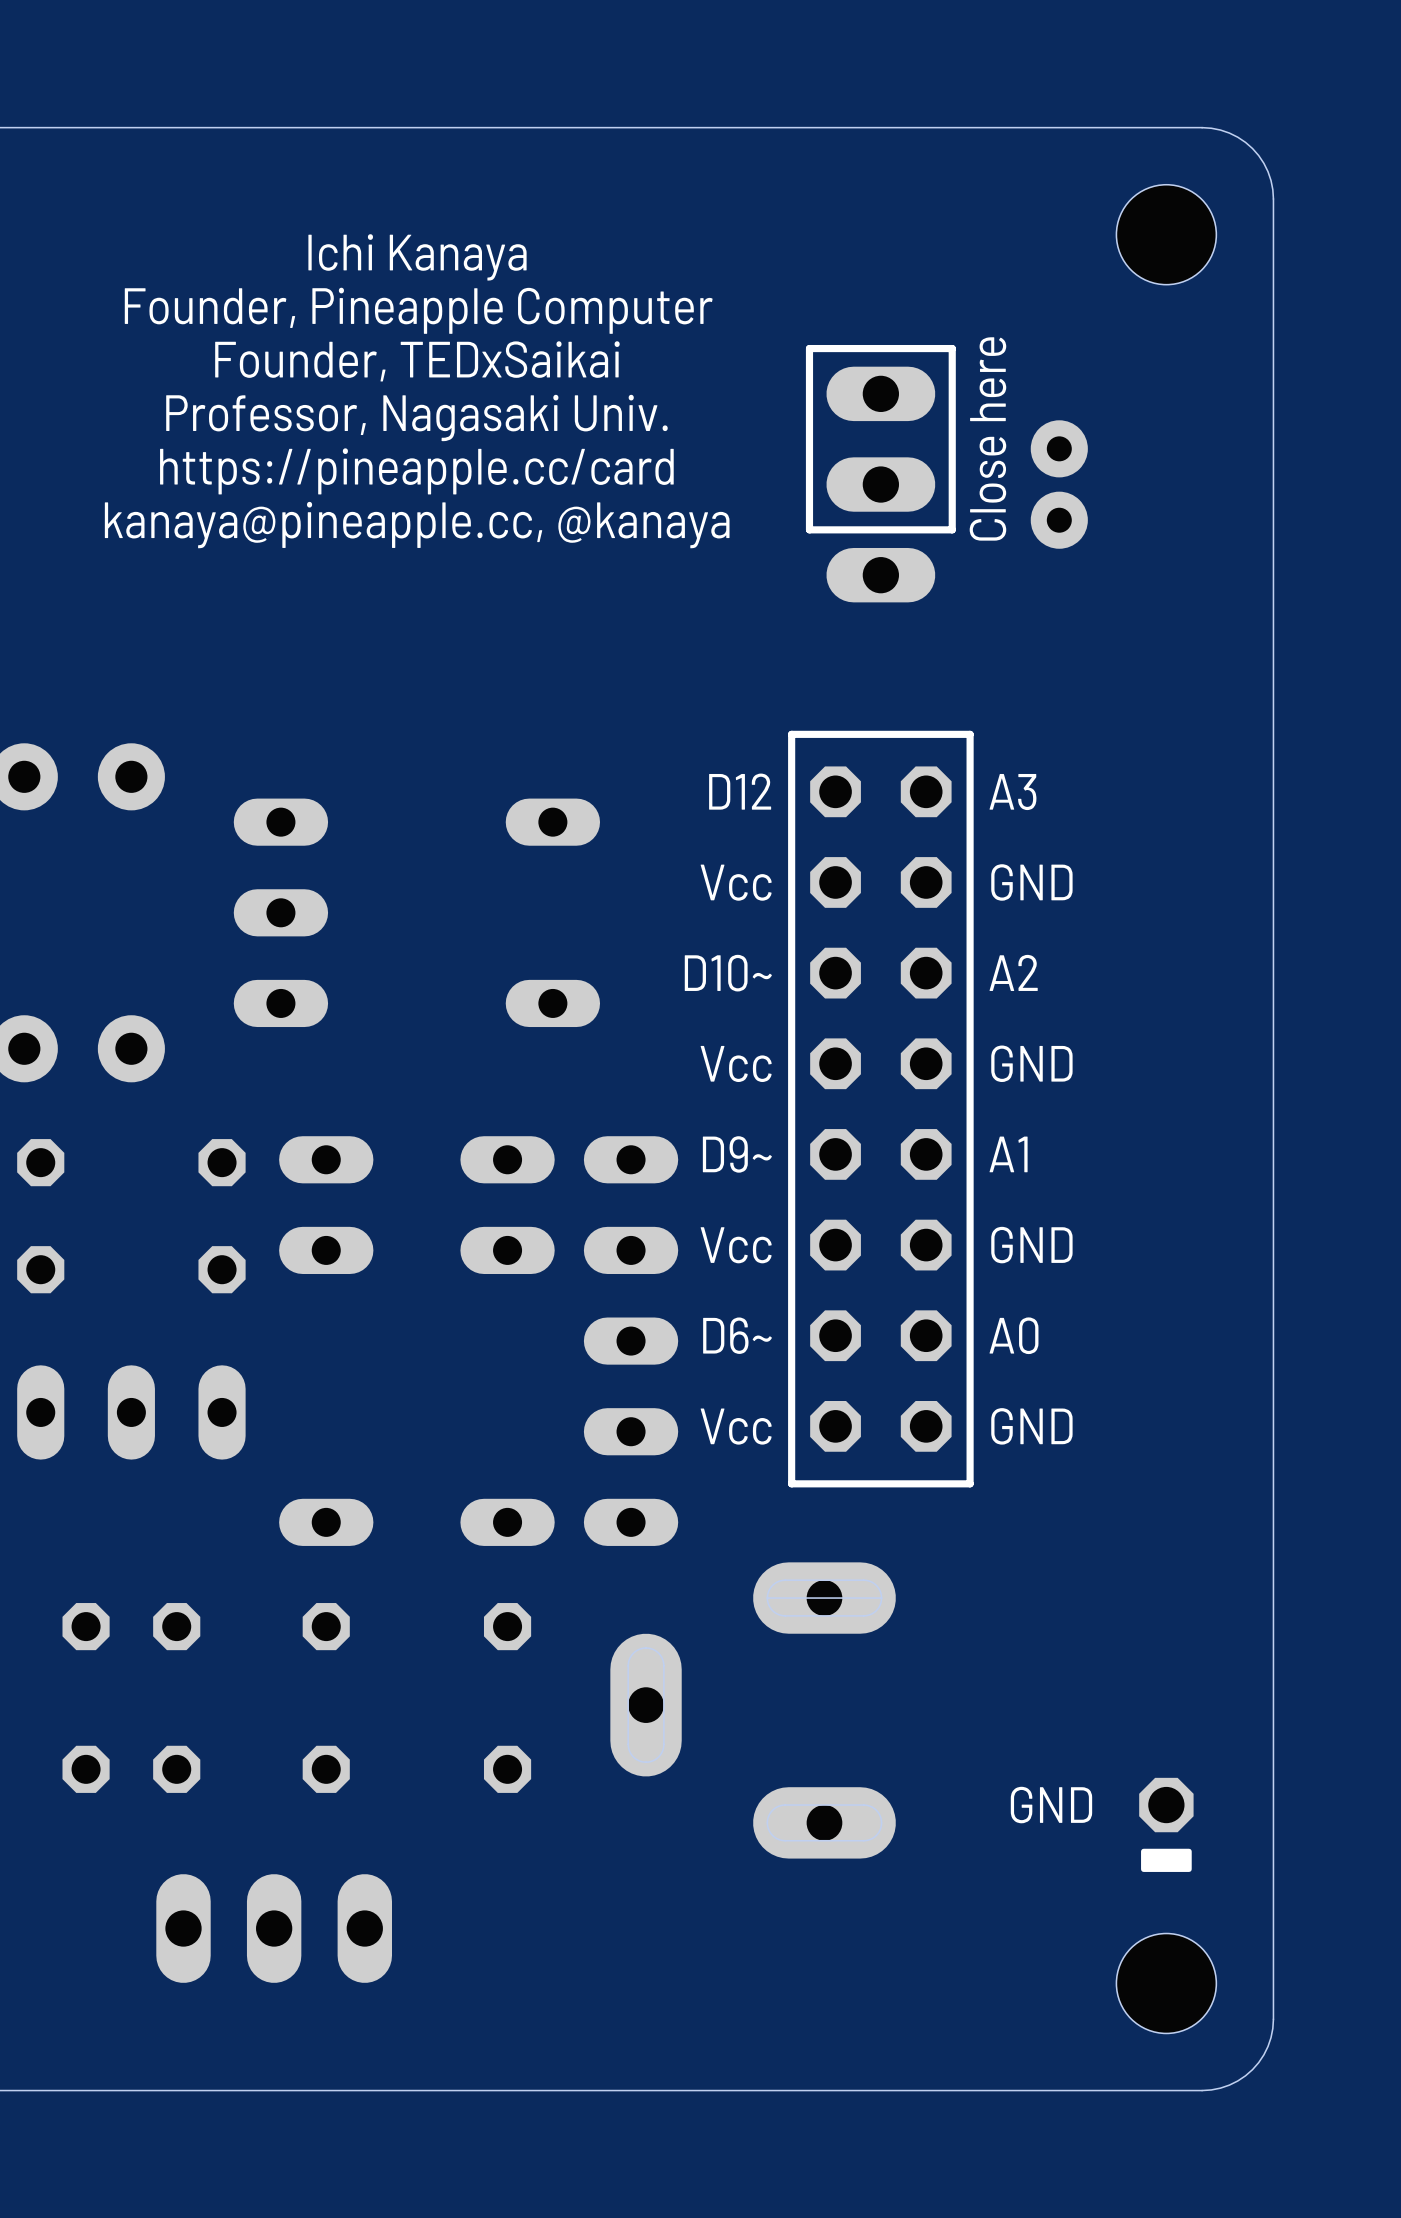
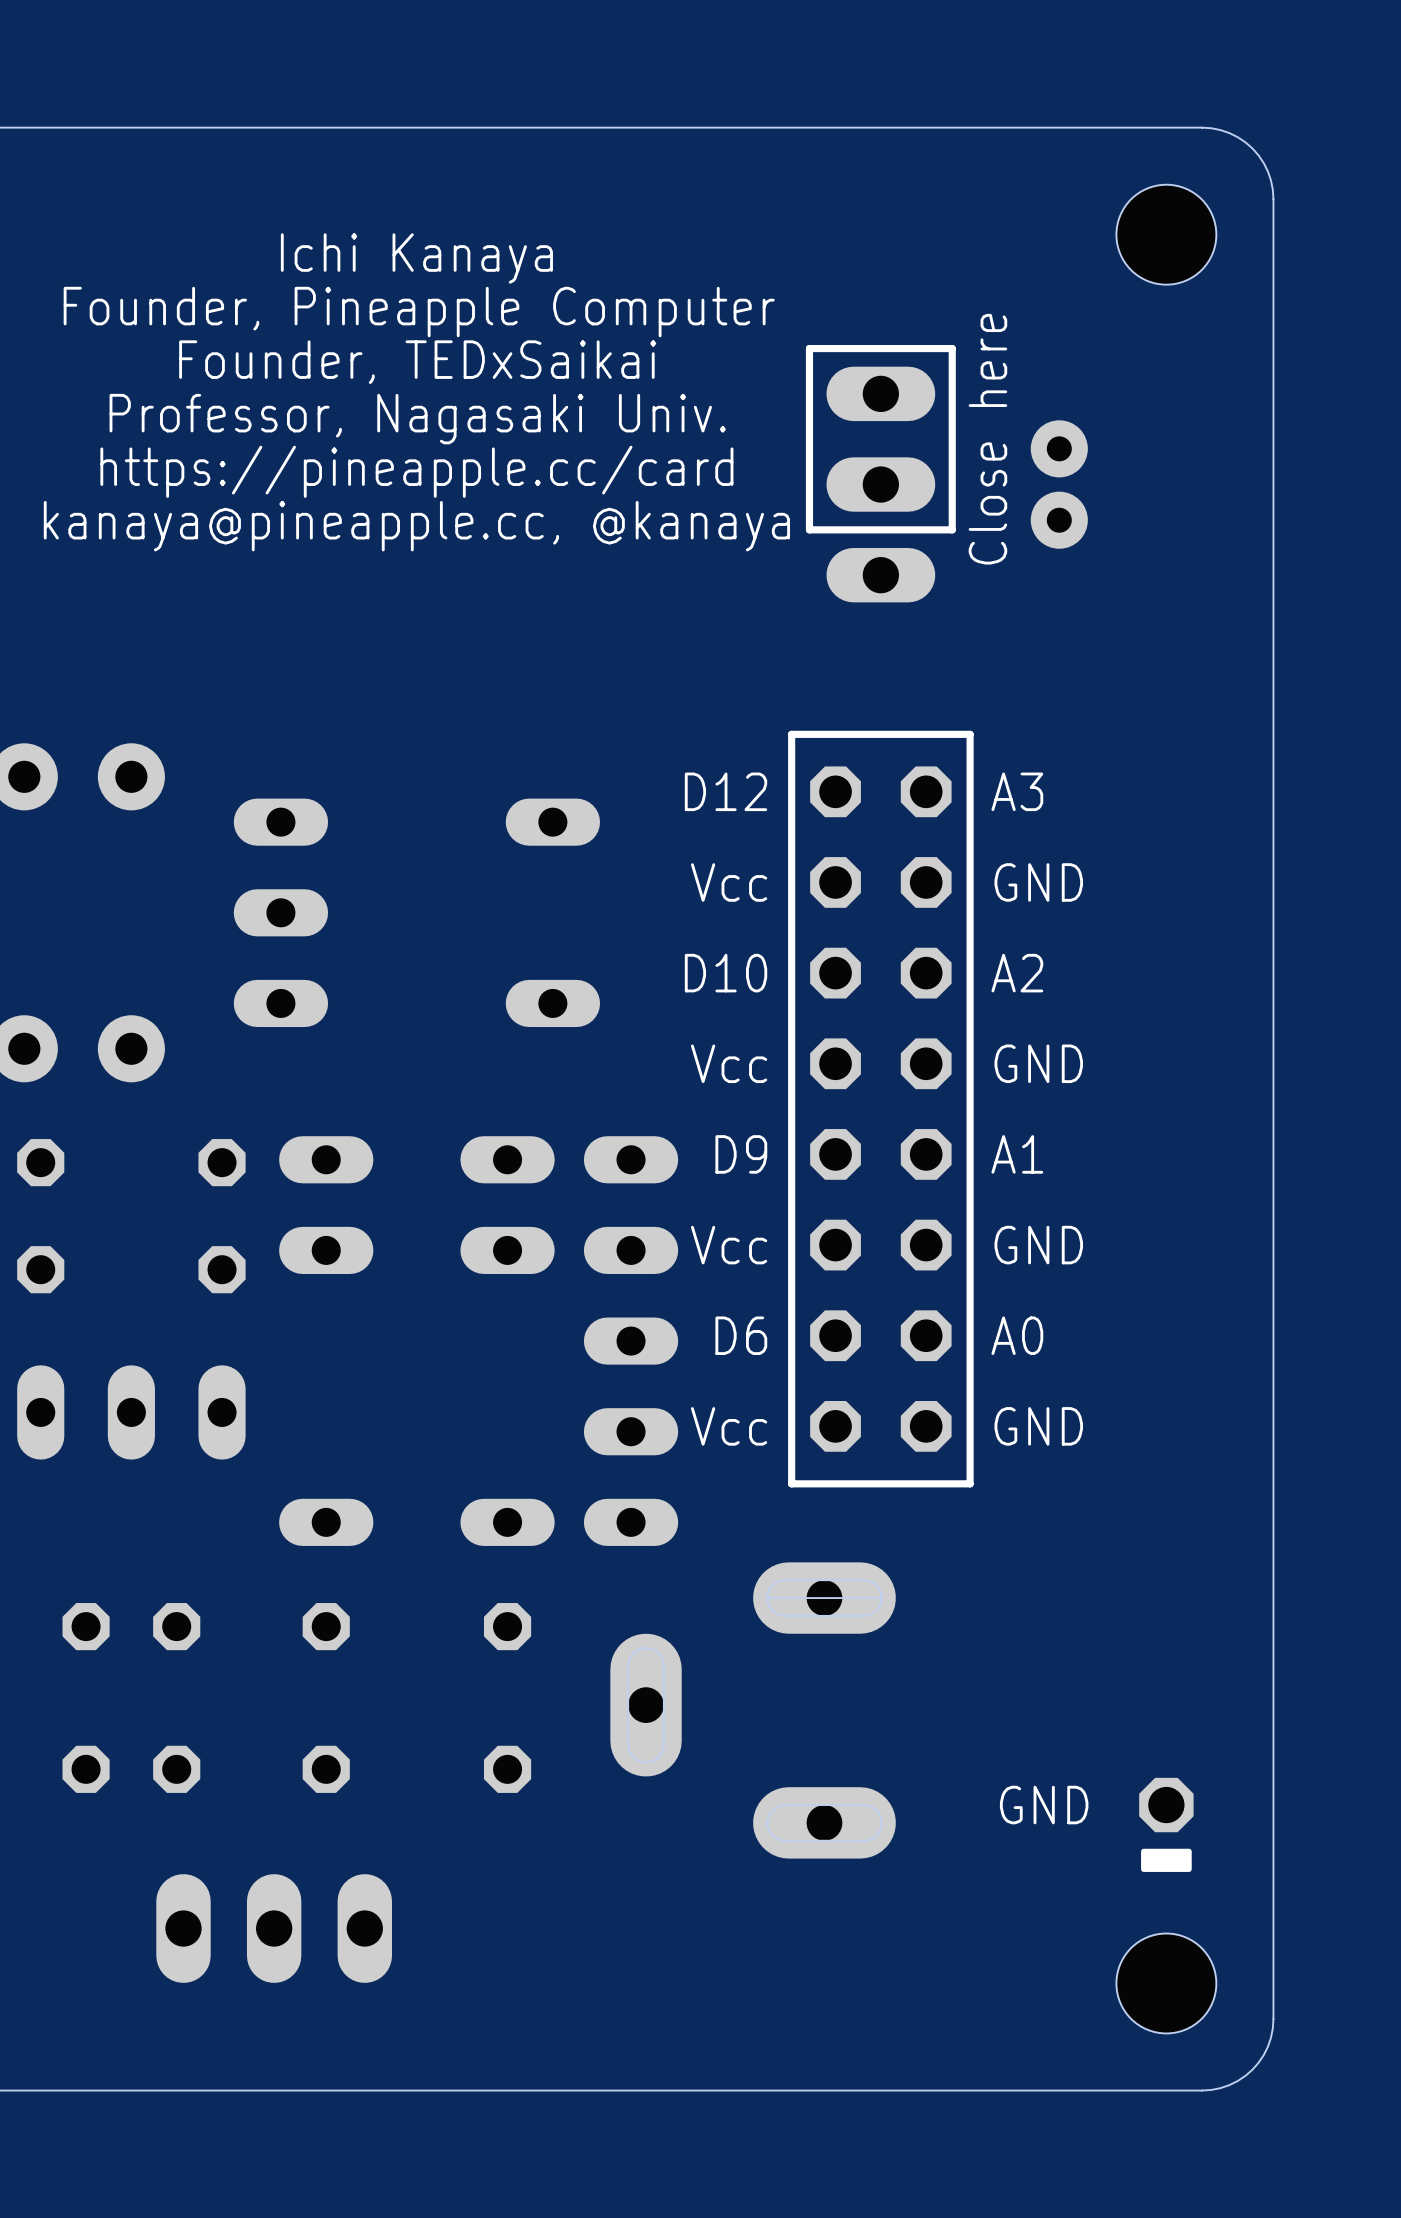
text: D10~ (728, 973) -> D10 (726, 973)
text: D9~ (737, 1154) -> D9 (741, 1154)
text: D6~ (737, 1335) -> D6 (741, 1335)

